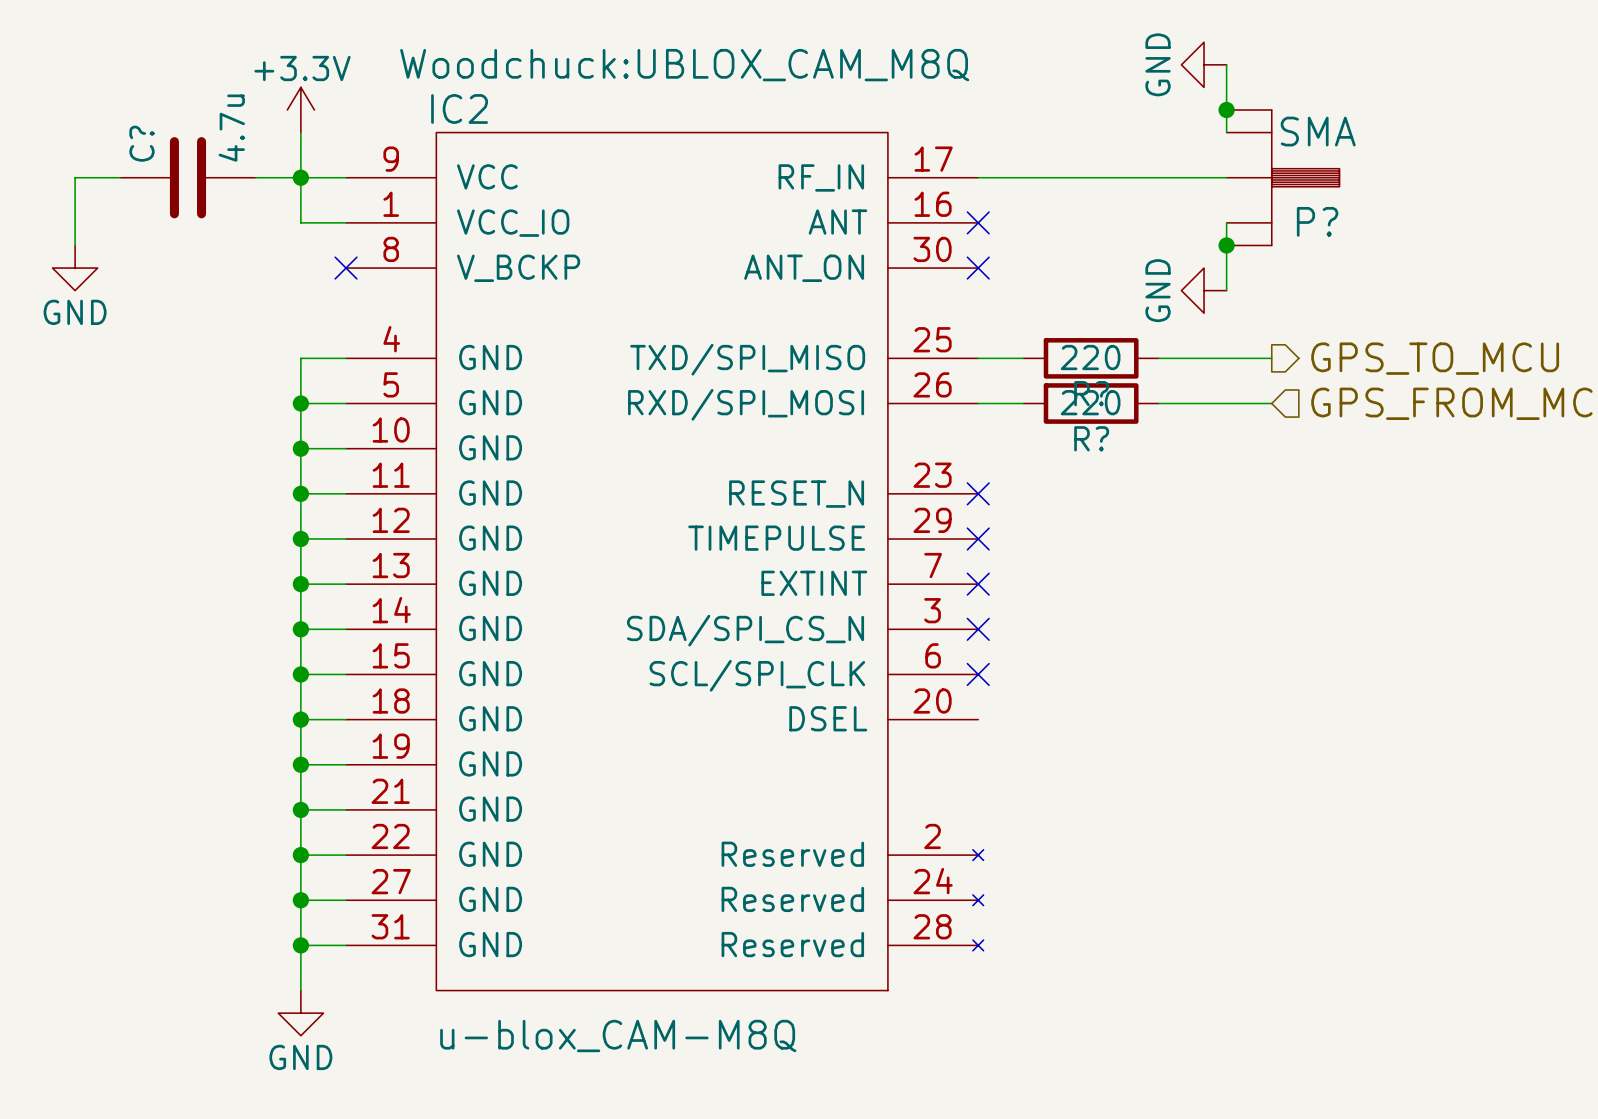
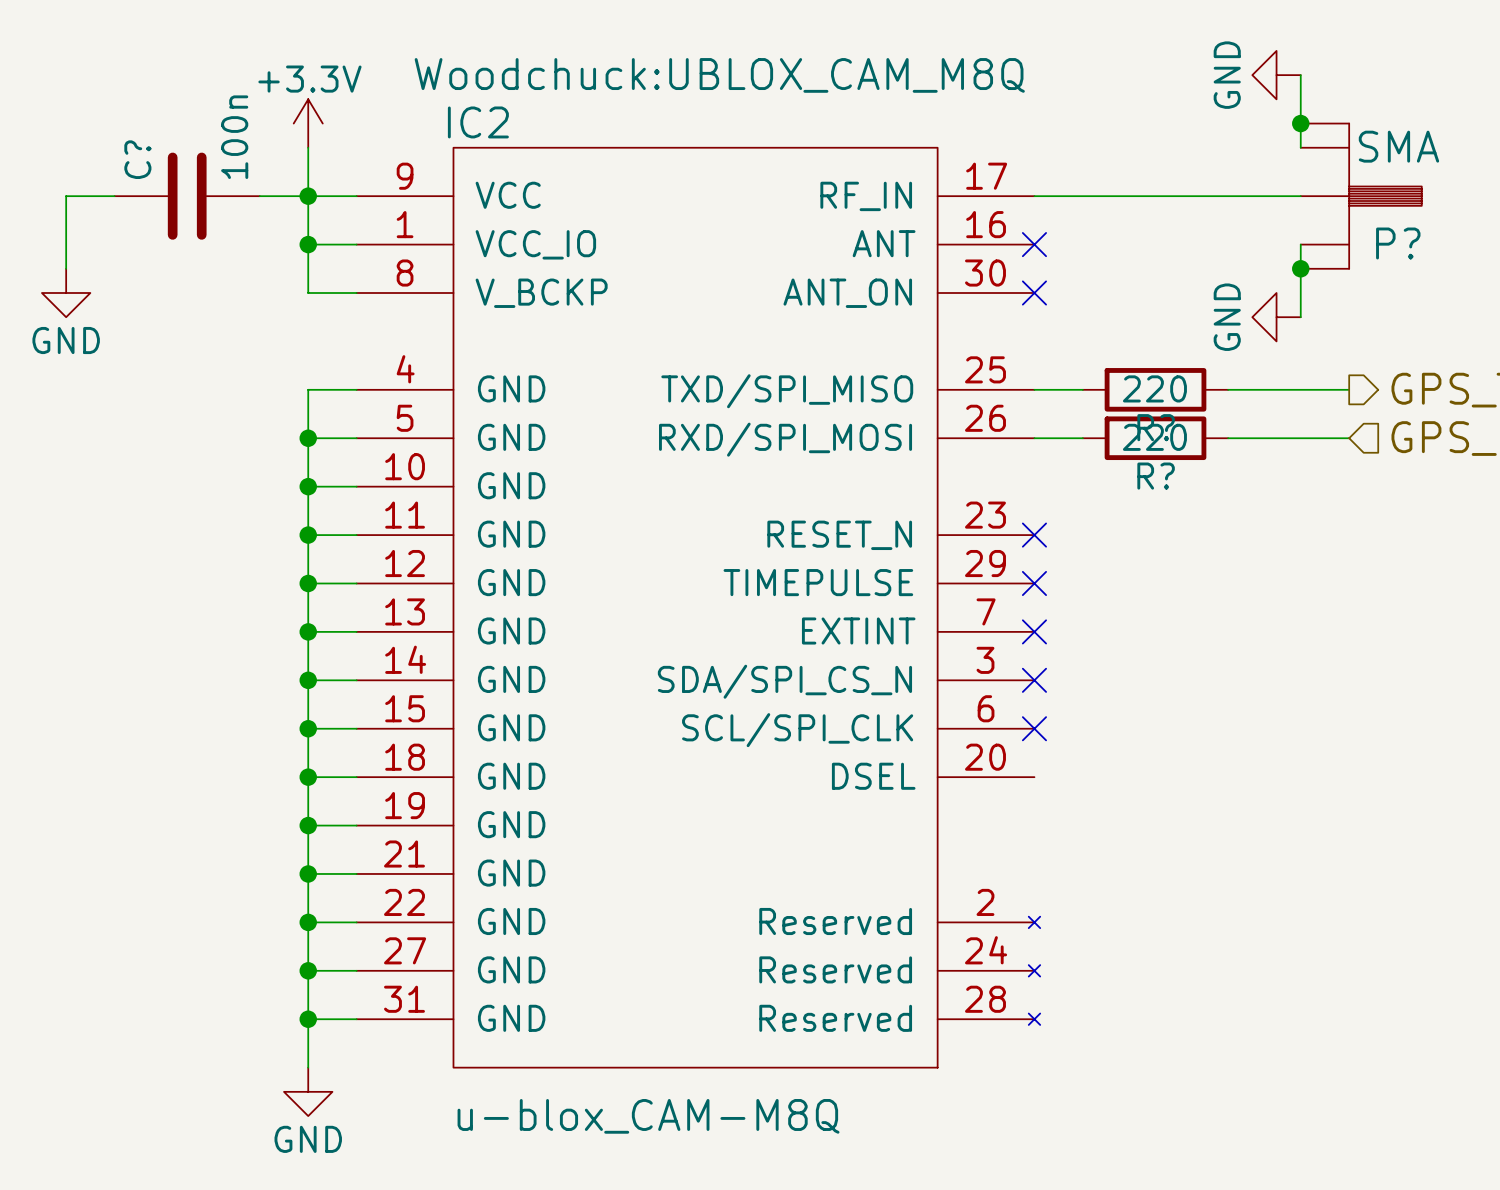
C? value: 4.7u (231, 128) -> 100n (234, 137)
wire: none -> (308, 244) (308, 292) (356, 292)
junction: none -> (308, 244)
no-connect mark: (346, 268) -> none

